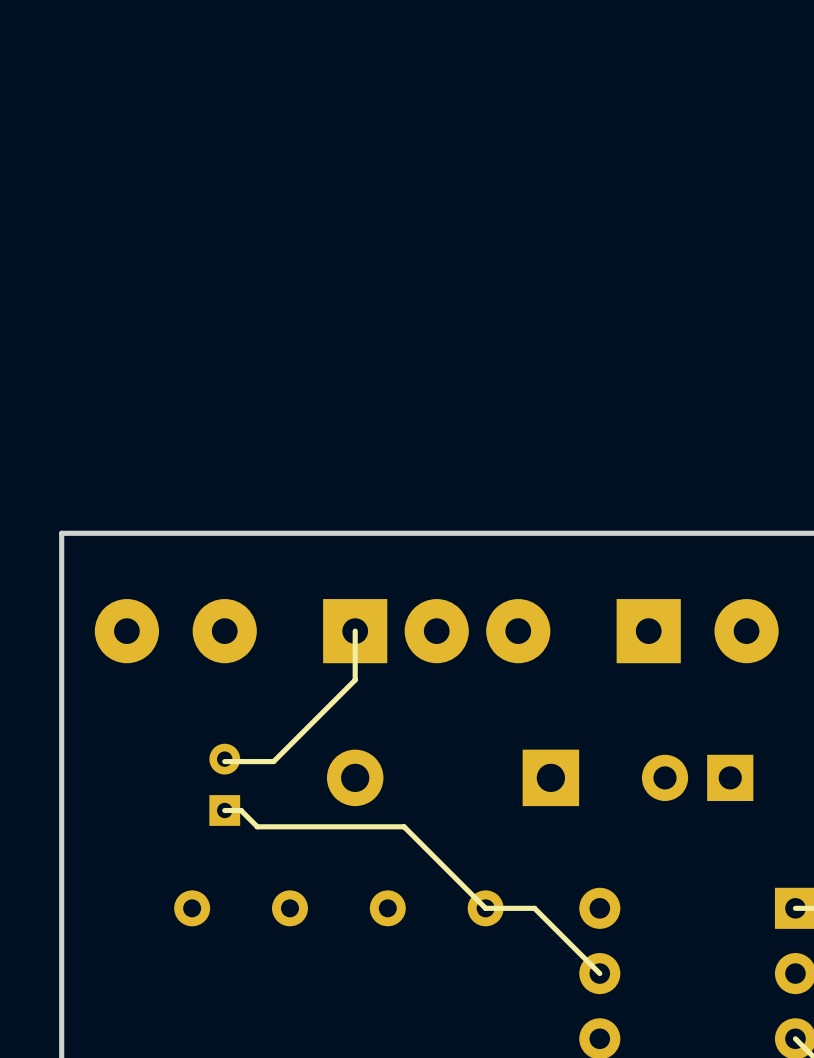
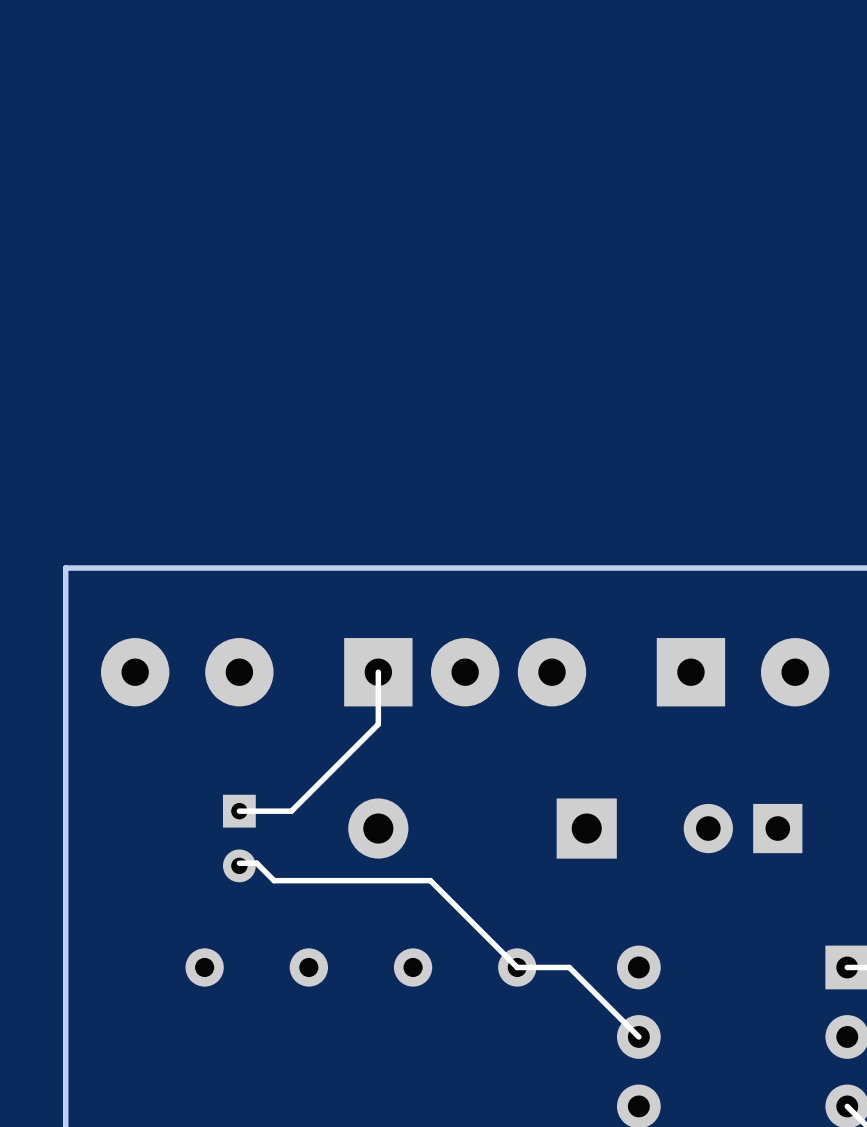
part rotation: 0° (224, 784) -> 180° (239, 838)

